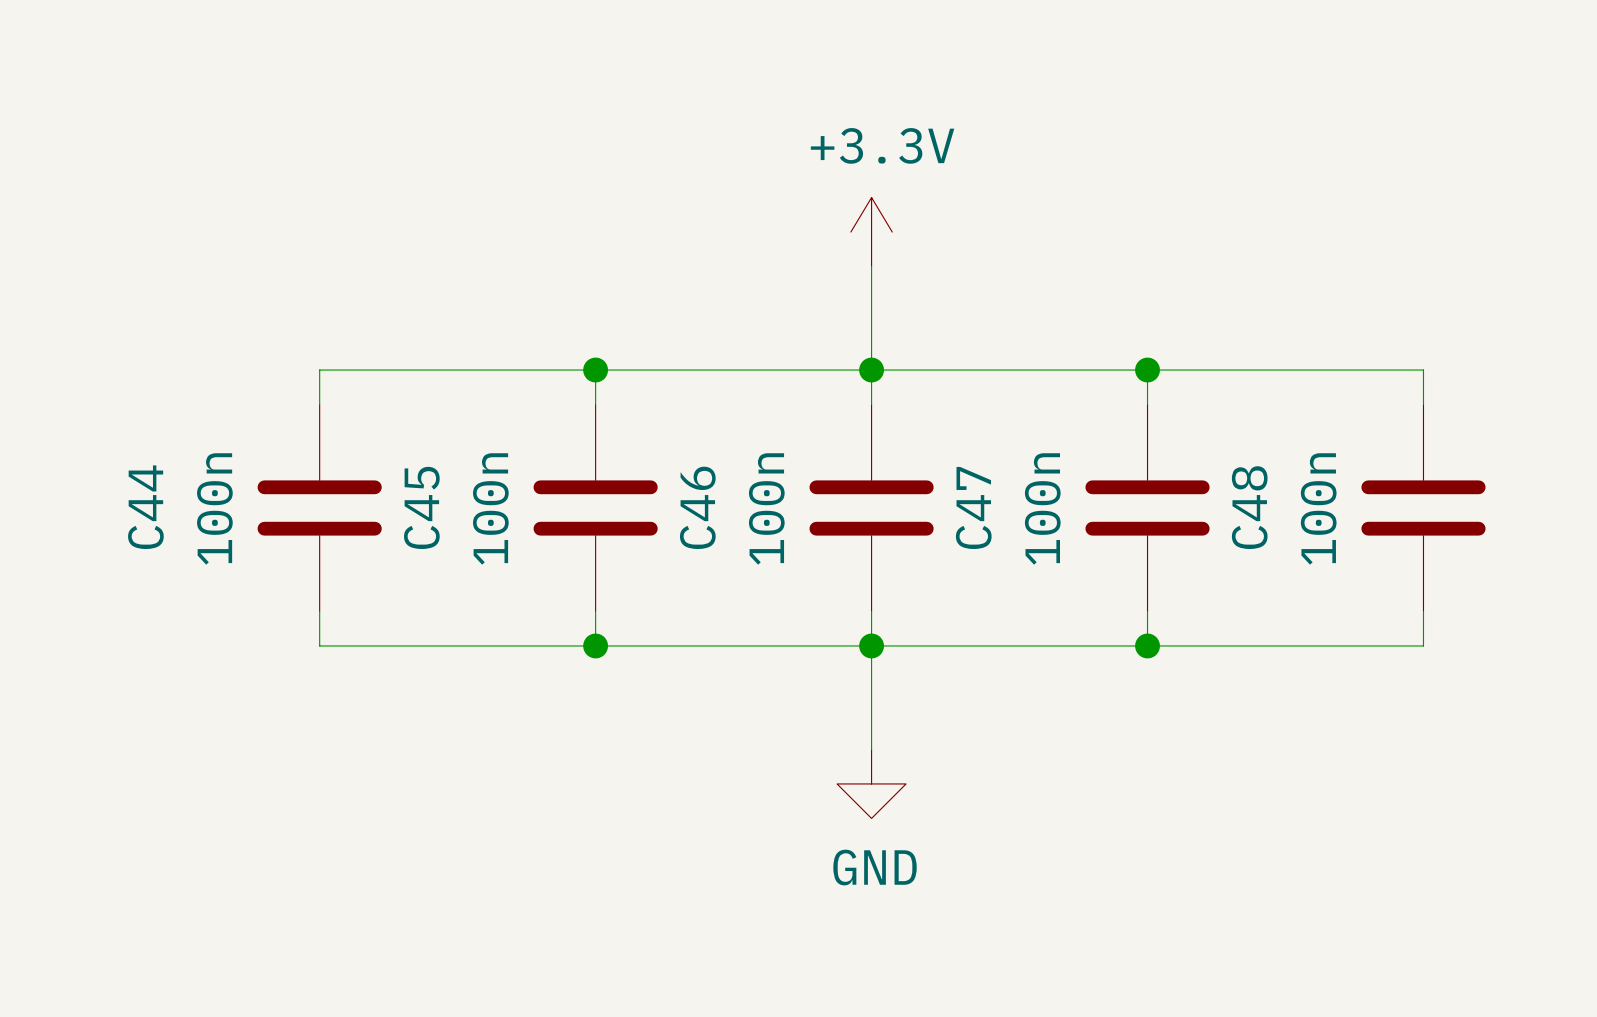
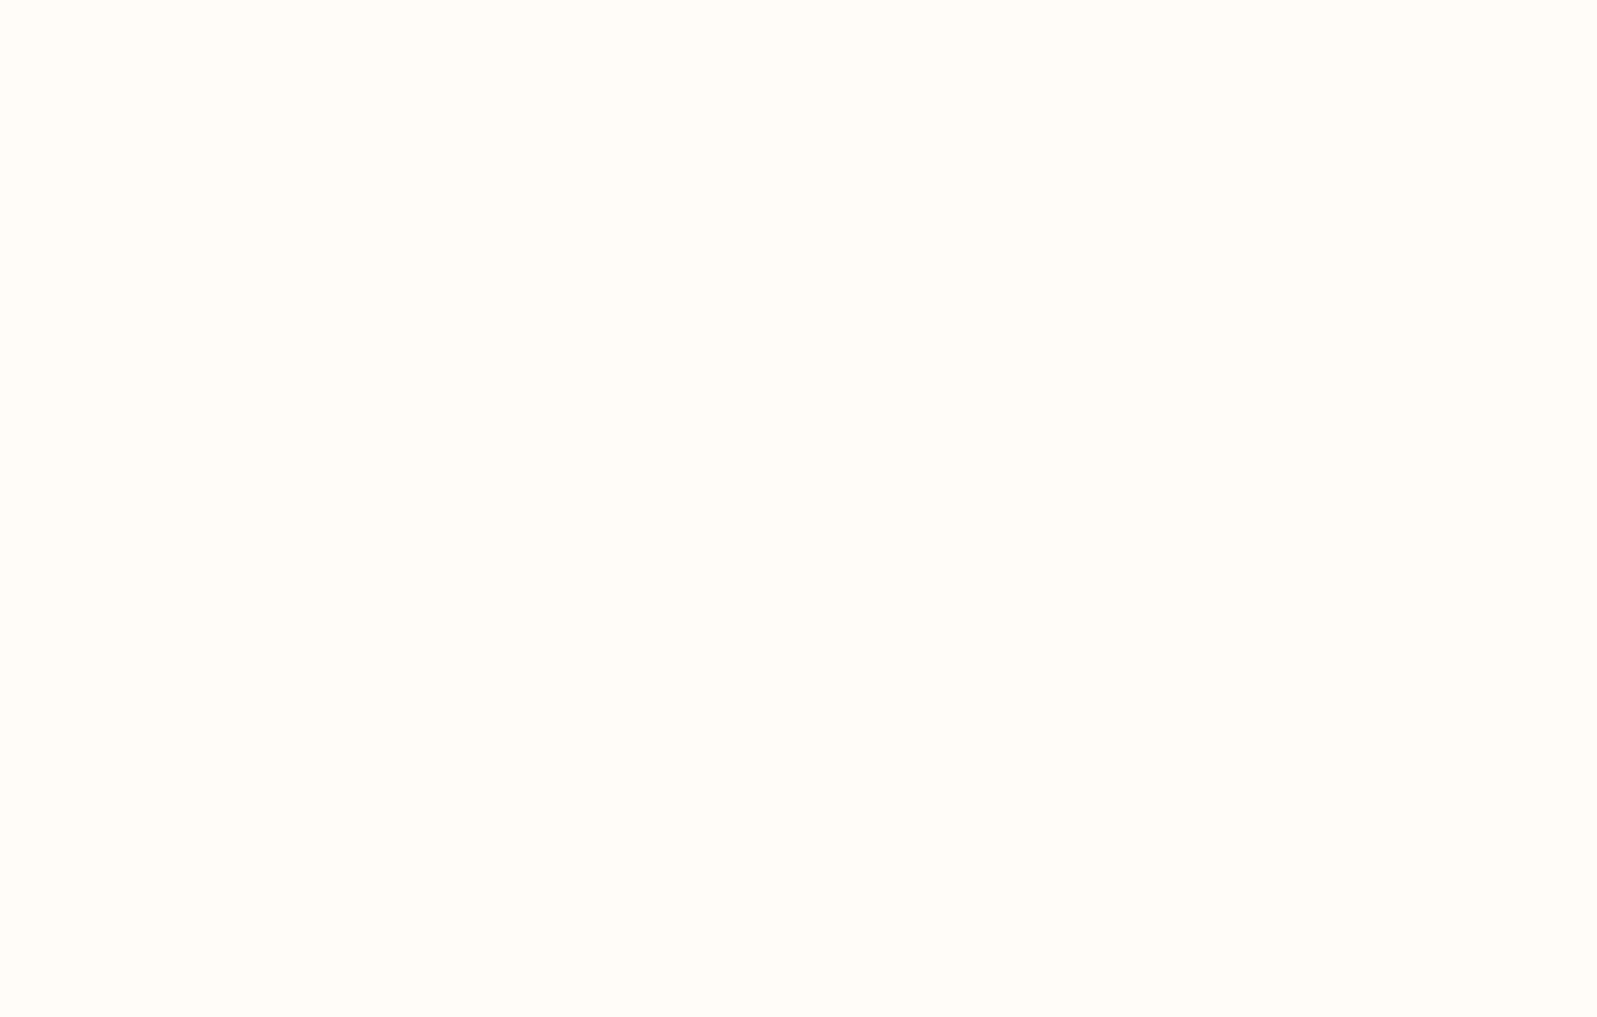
power symbol: +3.3V (871, 232) -> none
wire: (871, 266) (871, 404) -> none
wire: (595, 370) (595, 404) -> none
junction: (595, 370) -> none
junction: (871, 370) -> none
wire: (1147, 370) (1147, 404) -> none
junction: (1147, 370) -> none
wire: (319, 404) (319, 370) (1423, 370) (1423, 404) -> none
C44: 100n (319, 508) -> none
C45: 100n (595, 508) -> none
C46: 100n (871, 508) -> none
C47: 100n (1147, 508) -> none
C48: 100n (1423, 508) -> none
wire: (319, 611) (319, 645) (1423, 645) (1423, 611) -> none
wire: (595, 611) (595, 645) -> none
wire: (871, 611) (871, 749) -> none
wire: (1147, 611) (1147, 645) -> none
junction: (595, 645) -> none
junction: (871, 645) -> none
junction: (1147, 645) -> none
power symbol: GND (871, 783) -> none

